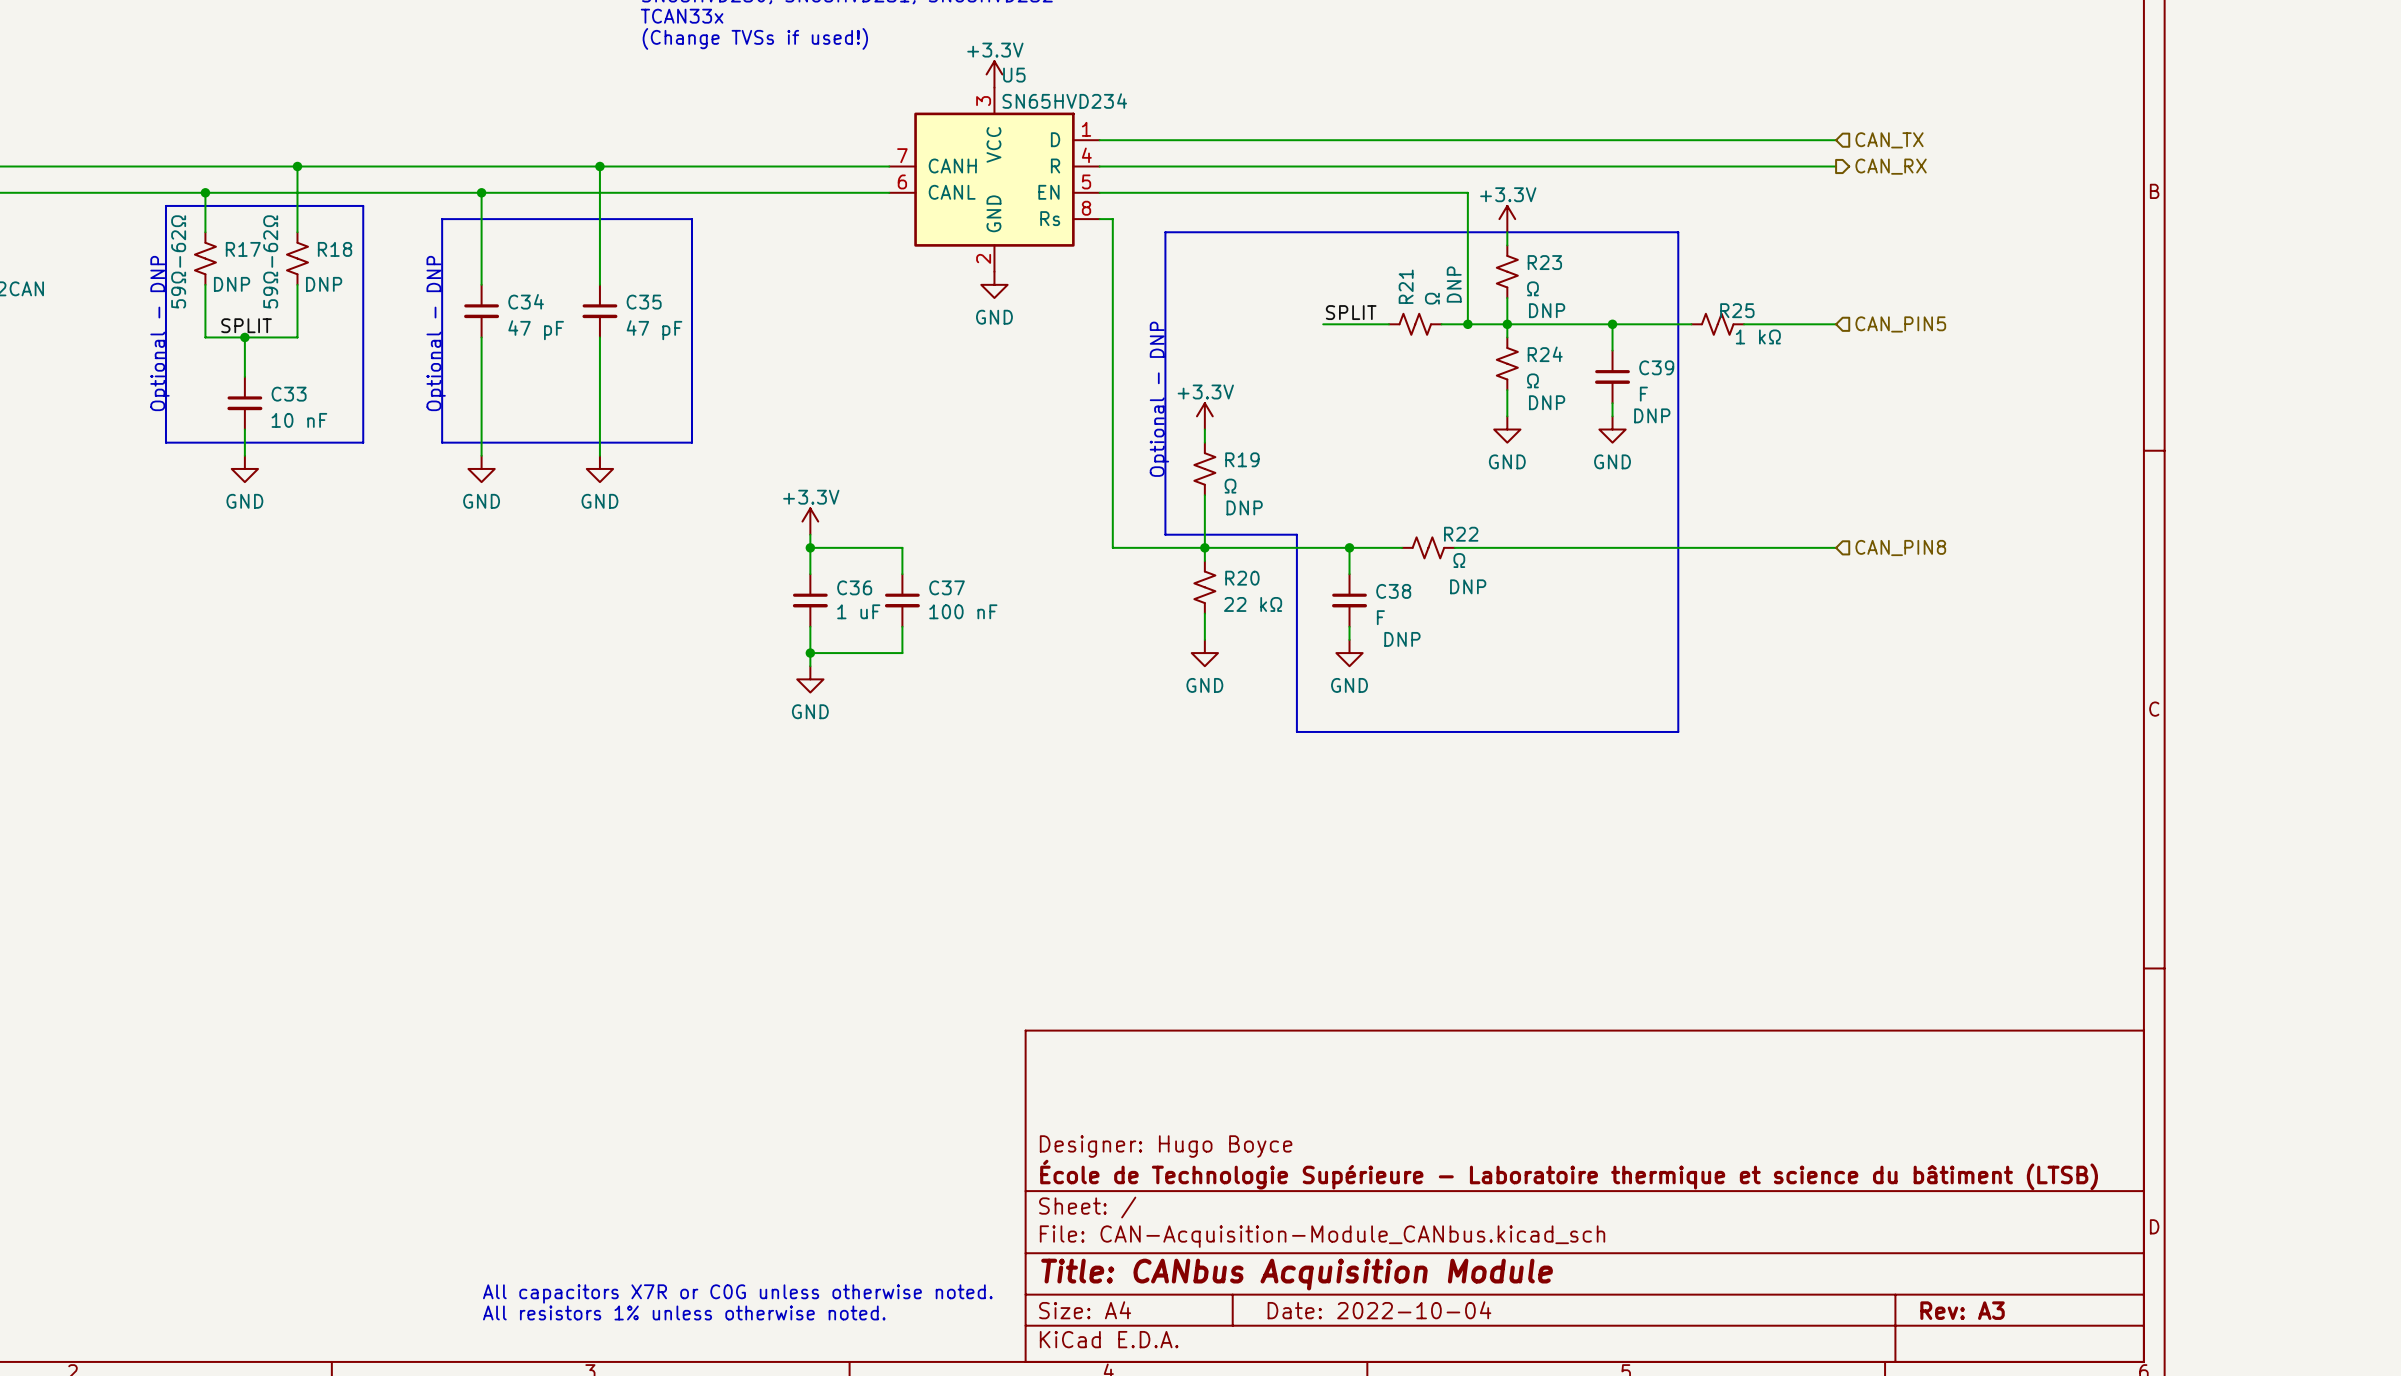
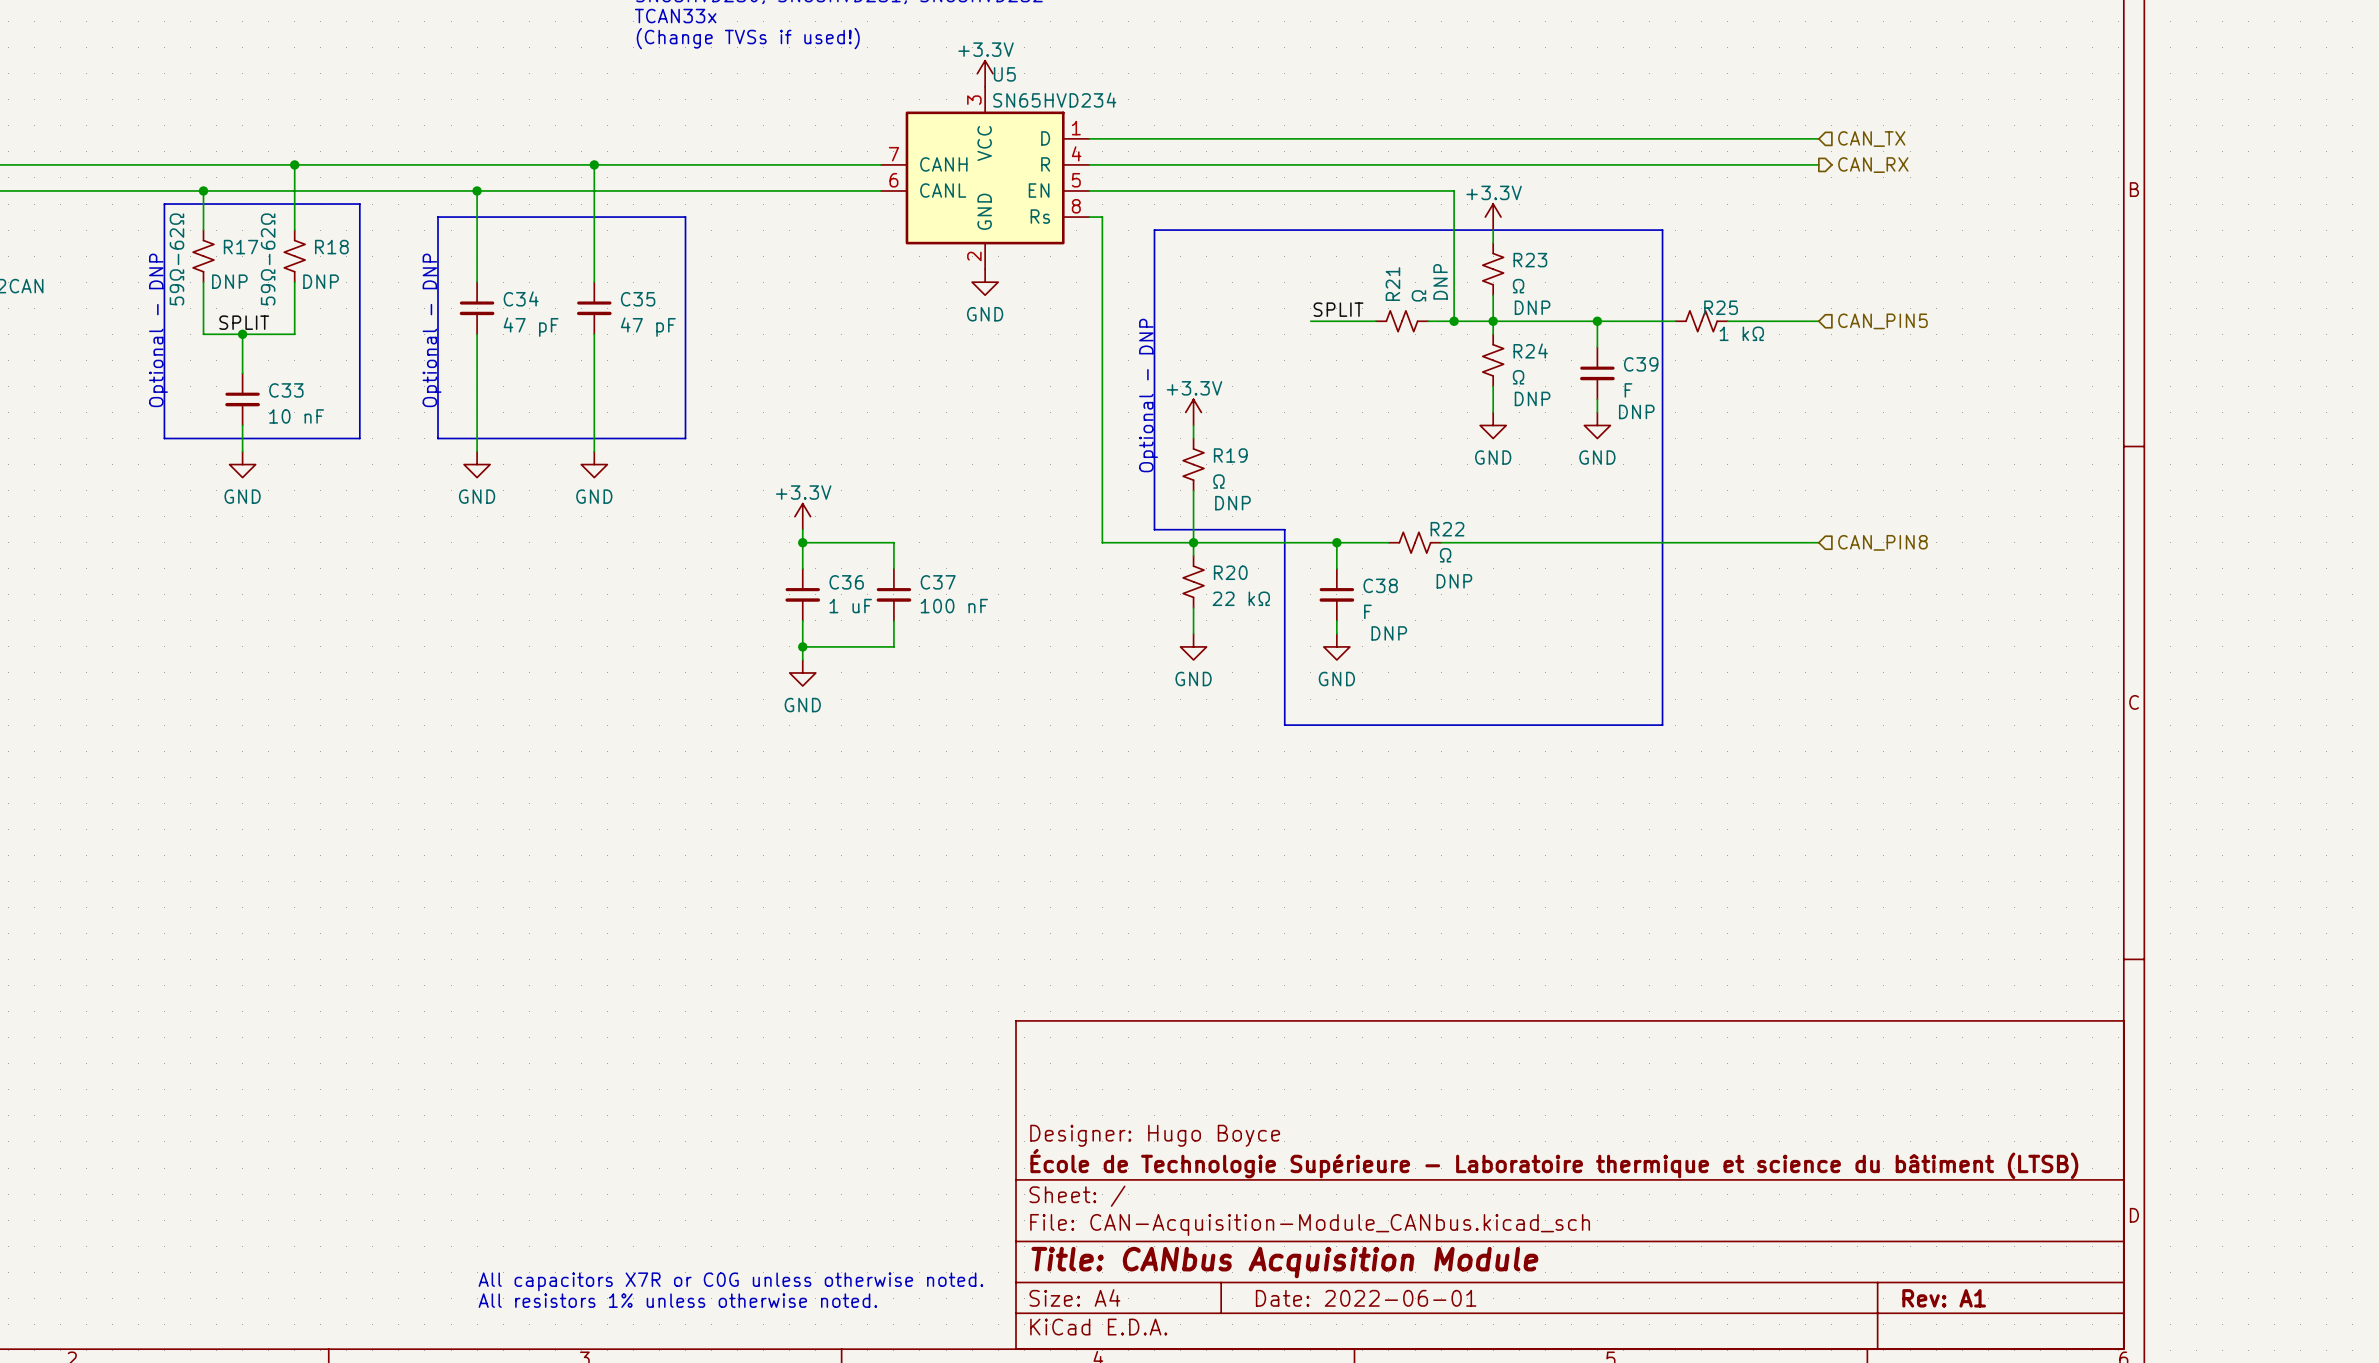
title block: Date: 2022-10-04 (1379, 1310) -> Date: 2022-06-01 (1366, 1298)
title block: Rev: A3 (1962, 1310) -> Rev: A1 (1944, 1298)

